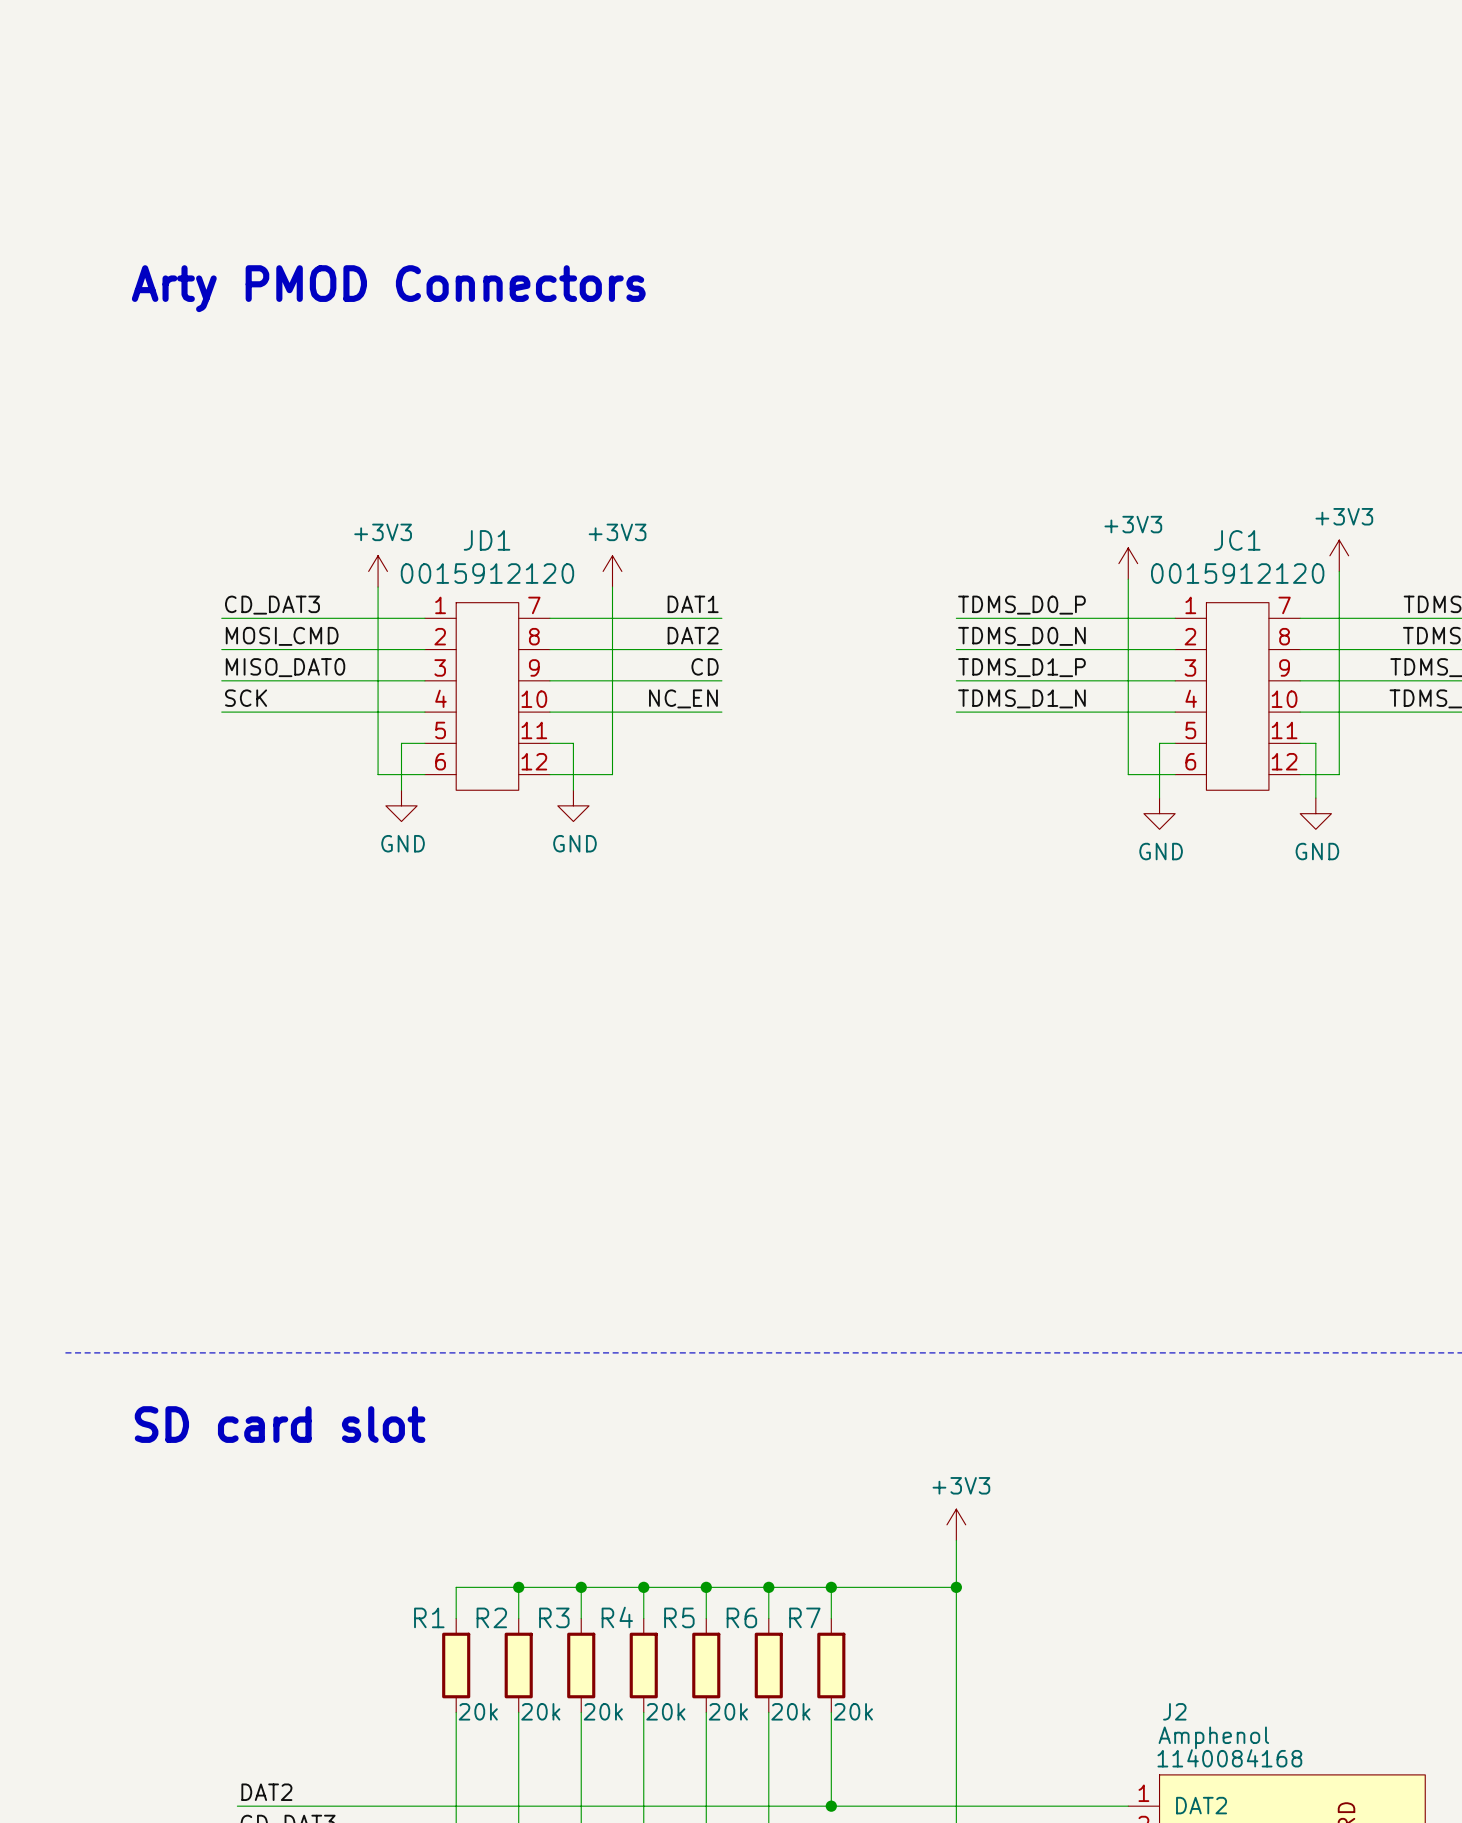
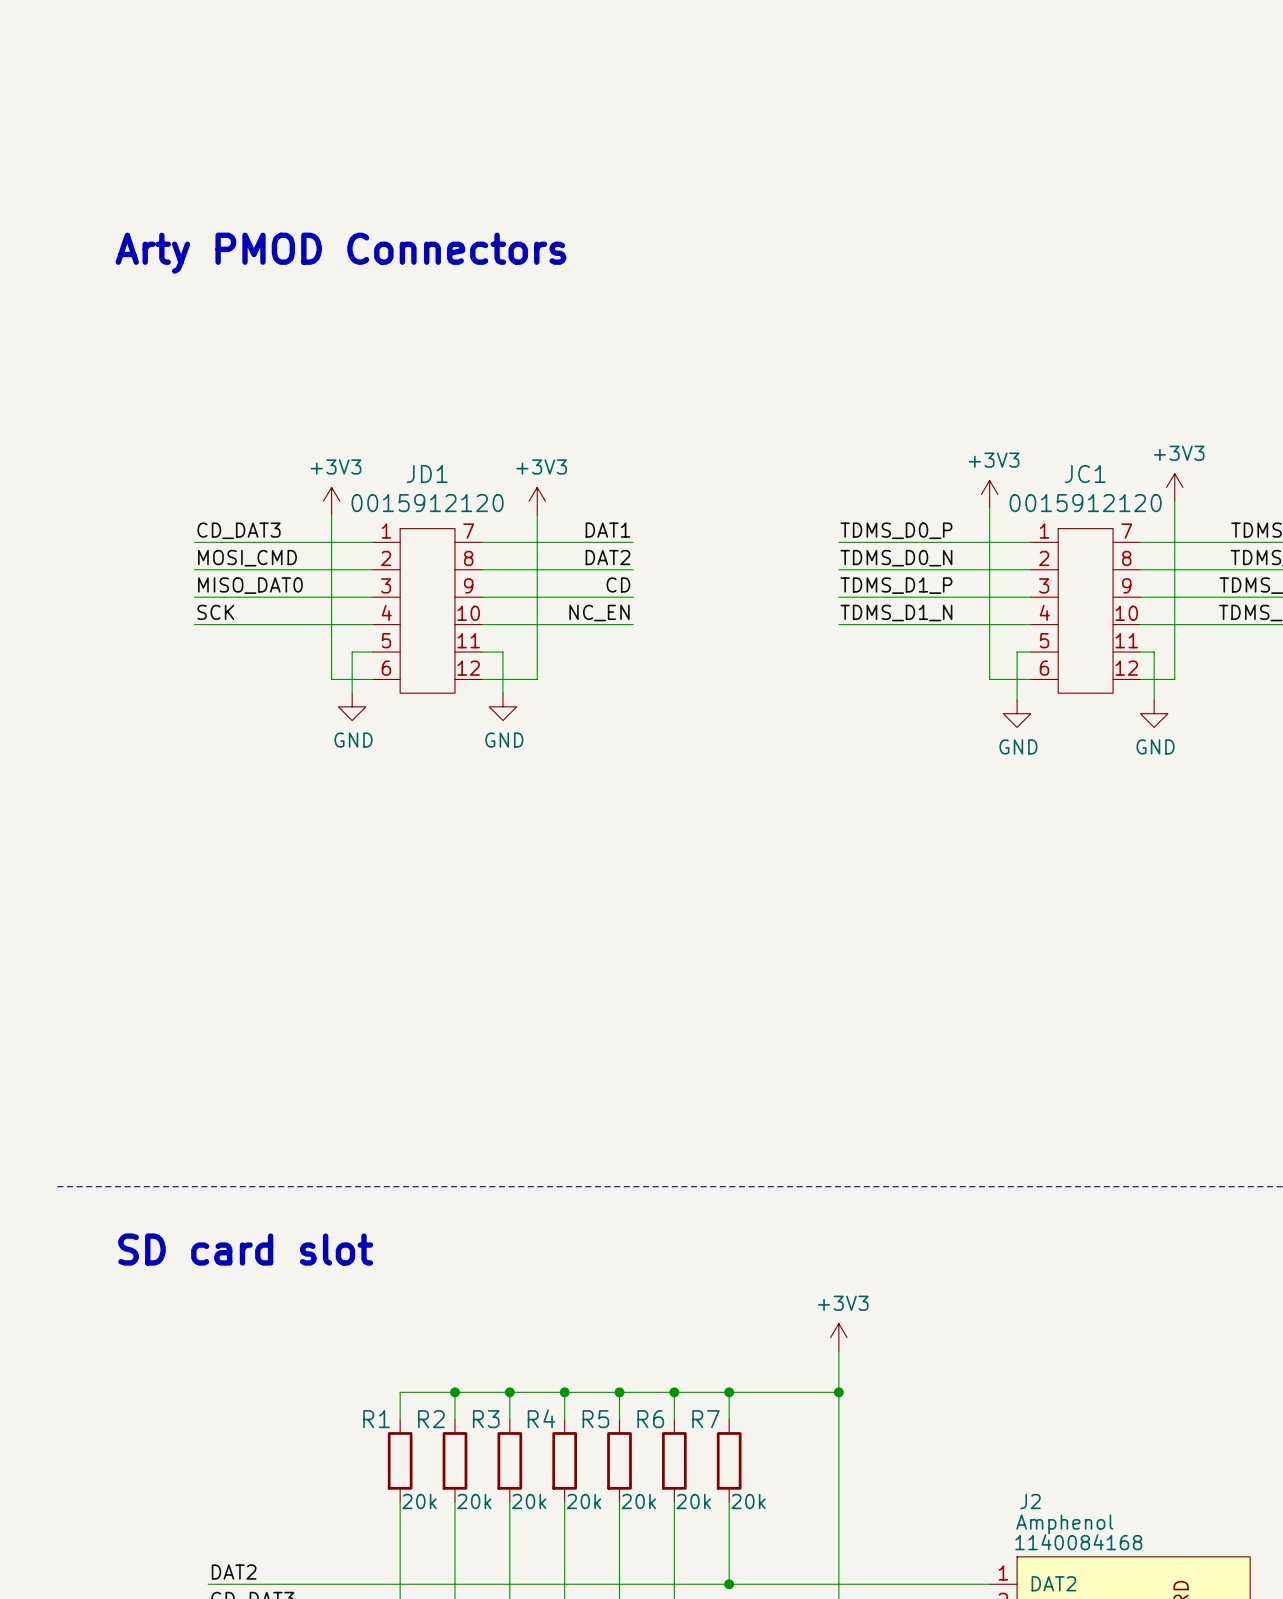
R1 symbol: [442, 1618, 471, 1713] -> [387, 1419, 413, 1503]
R2 symbol: [504, 1618, 533, 1713] -> [442, 1419, 468, 1503]
R3 symbol: [567, 1618, 596, 1713] -> [497, 1419, 523, 1503]
R4 symbol: [629, 1618, 658, 1713] -> [552, 1419, 578, 1503]
R5 symbol: [692, 1618, 721, 1713] -> [607, 1419, 632, 1503]
R6 symbol: [754, 1618, 783, 1713] -> [662, 1419, 687, 1503]
R7 symbol: [817, 1618, 846, 1713] -> [716, 1419, 742, 1503]

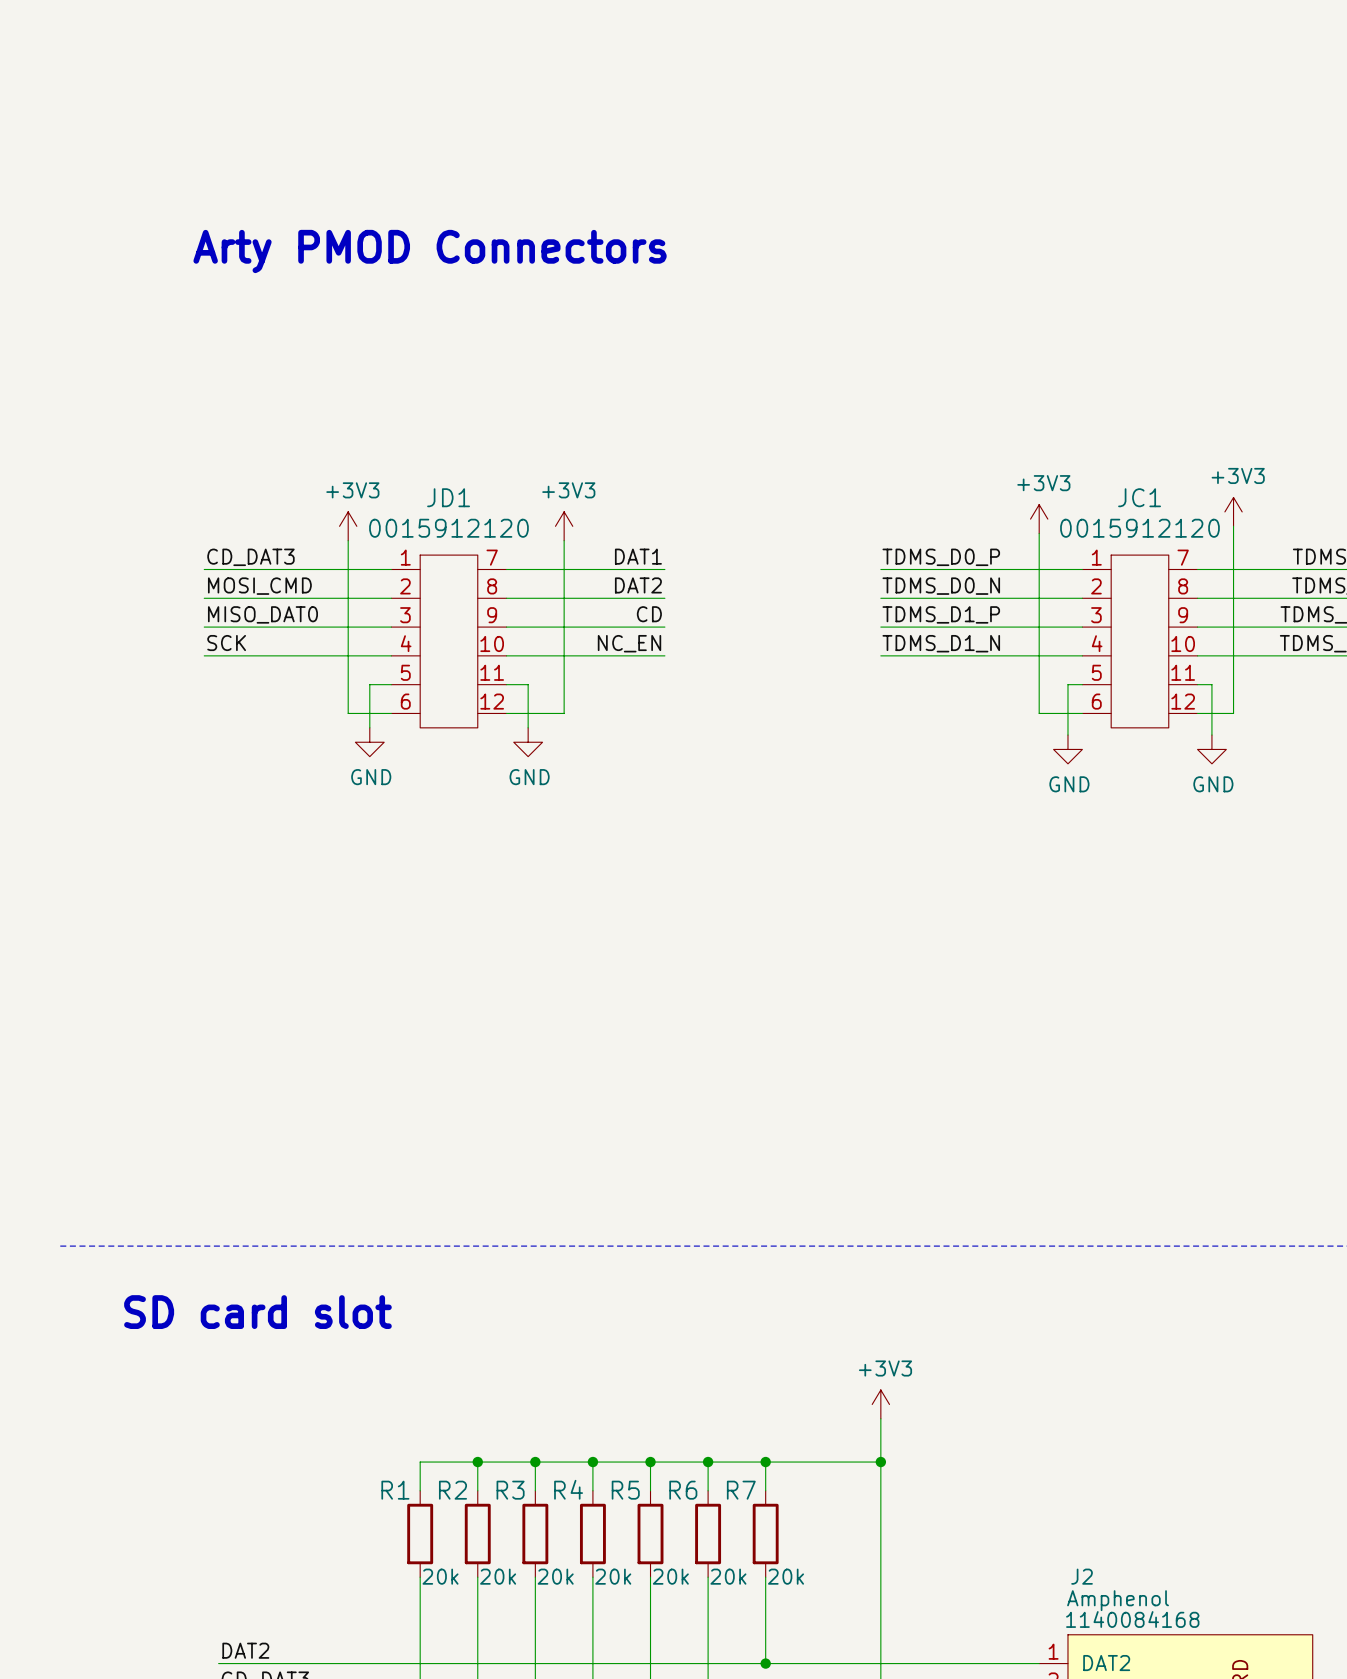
text position: Arty PMOD Connectors (340, 253) -> Arty PMOD Connectors (430, 251)

